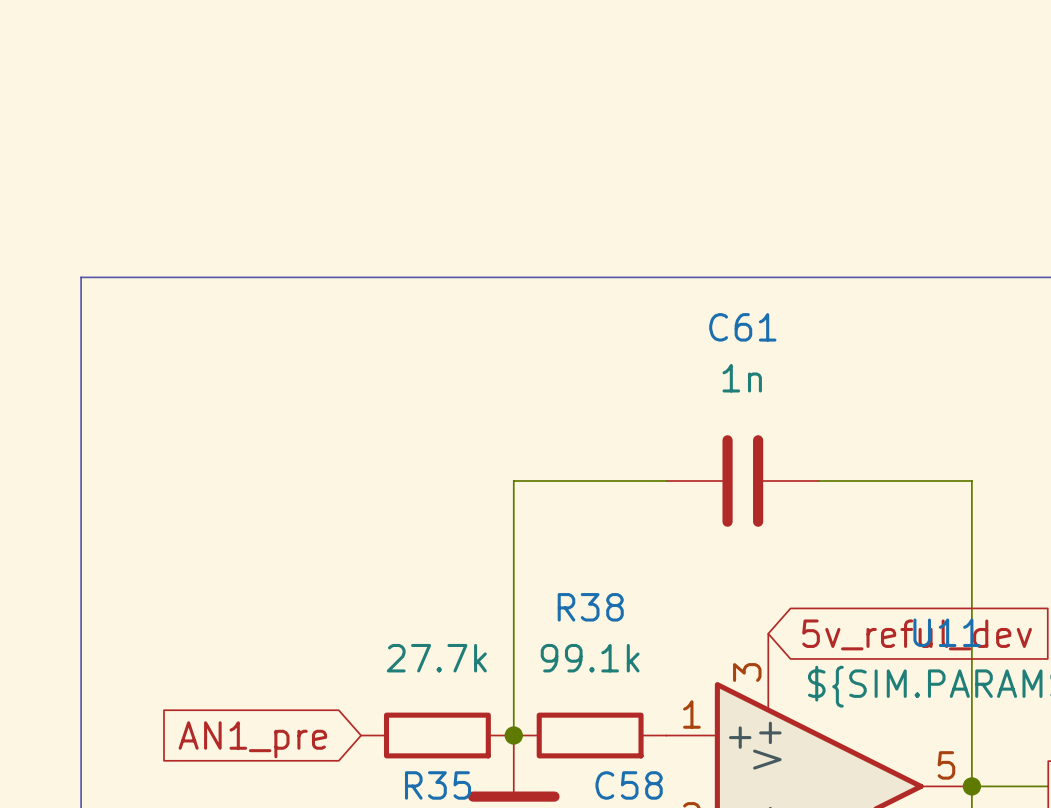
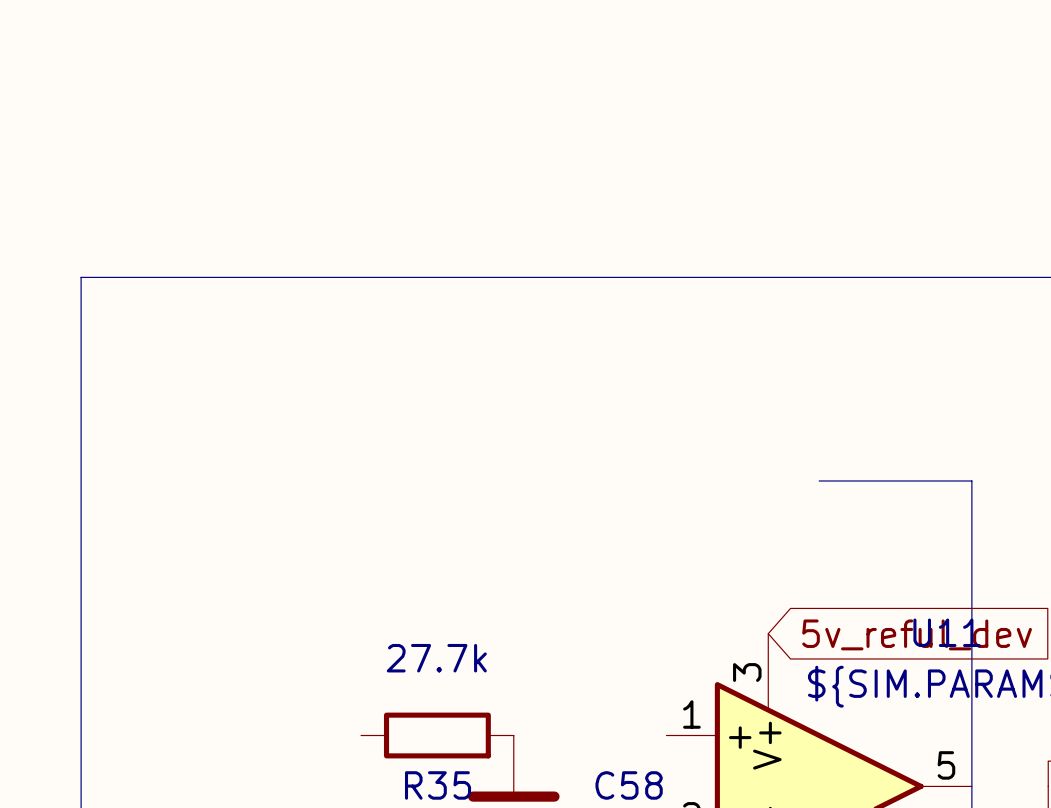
wire: (666, 480) (513, 480) (513, 735) -> none
C61: 1n (742, 480) -> none
junction: (513, 735) -> none
R38: 99.1k (590, 735) -> none
global label: AN1_pre (252, 739) -> none
wire: (971, 786) (1048, 786) -> none
junction: (971, 786) -> none

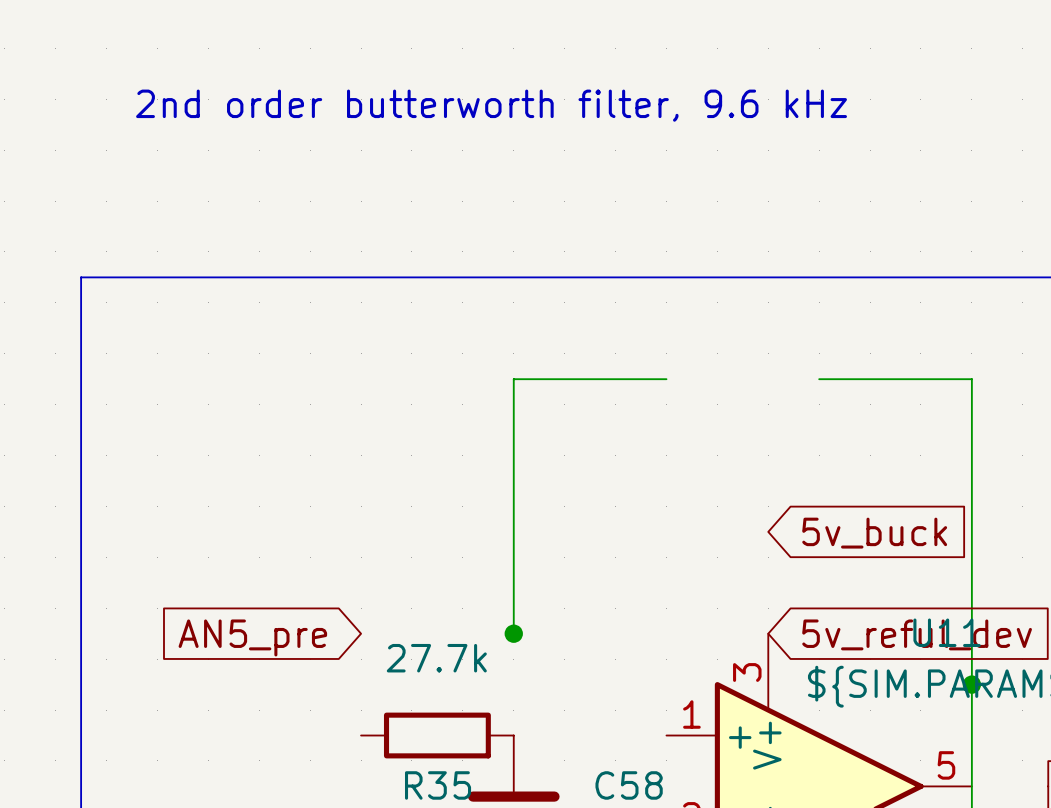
text: none -> 2nd order butterworth filter, 9.6 kHz (491, 105)
wire: none -> (666, 379) (513, 379) (513, 633)
wire: (819, 480) (971, 480) -> (819, 379) (971, 379) (971, 480)
global label: none -> 5v_buck (874, 533)
junction: none -> (513, 633)
global label: none -> AN5_pre (252, 637)
junction: none -> (971, 684)

